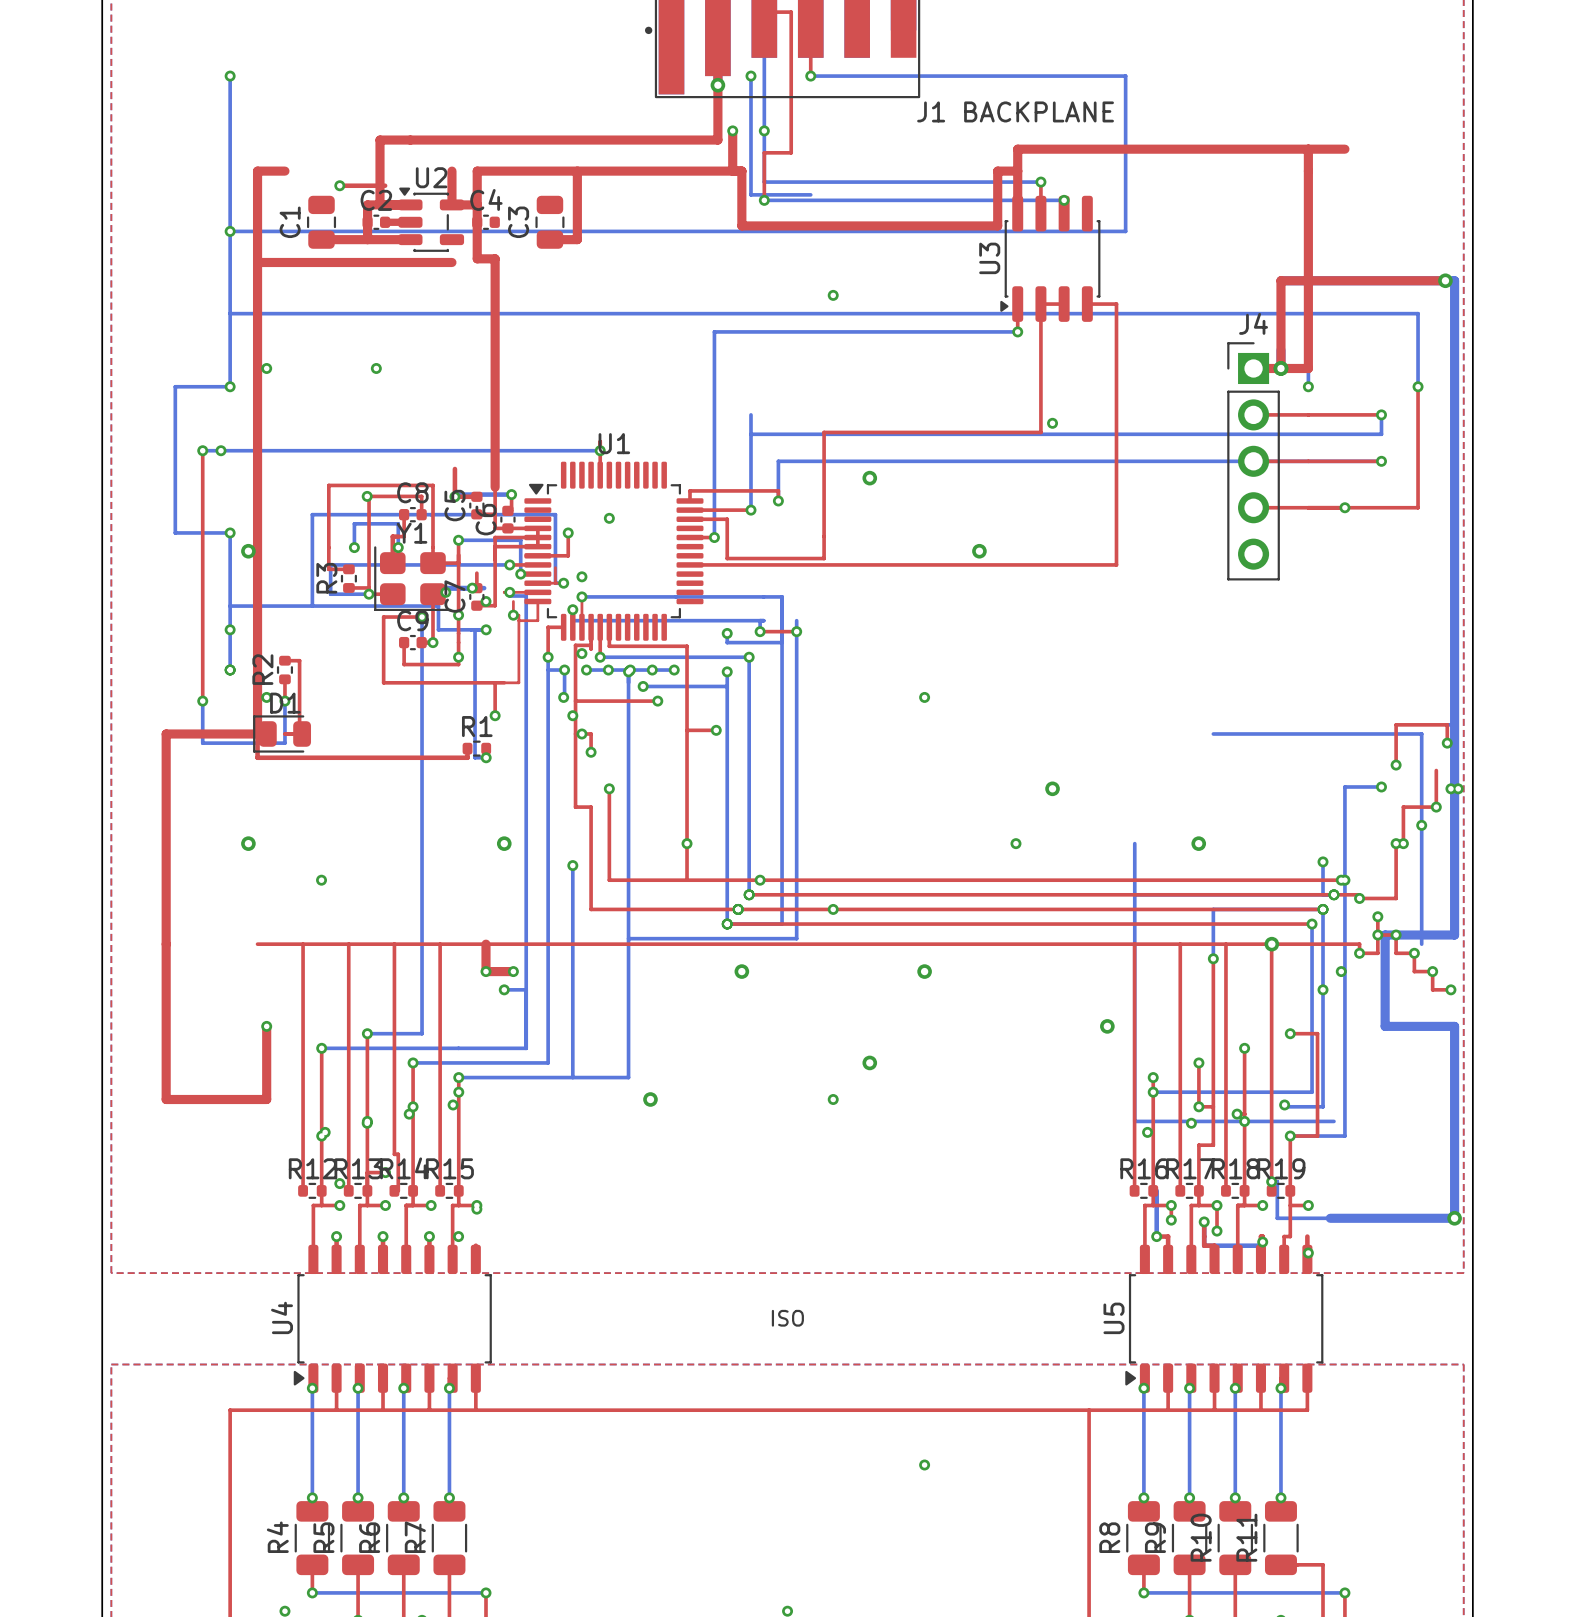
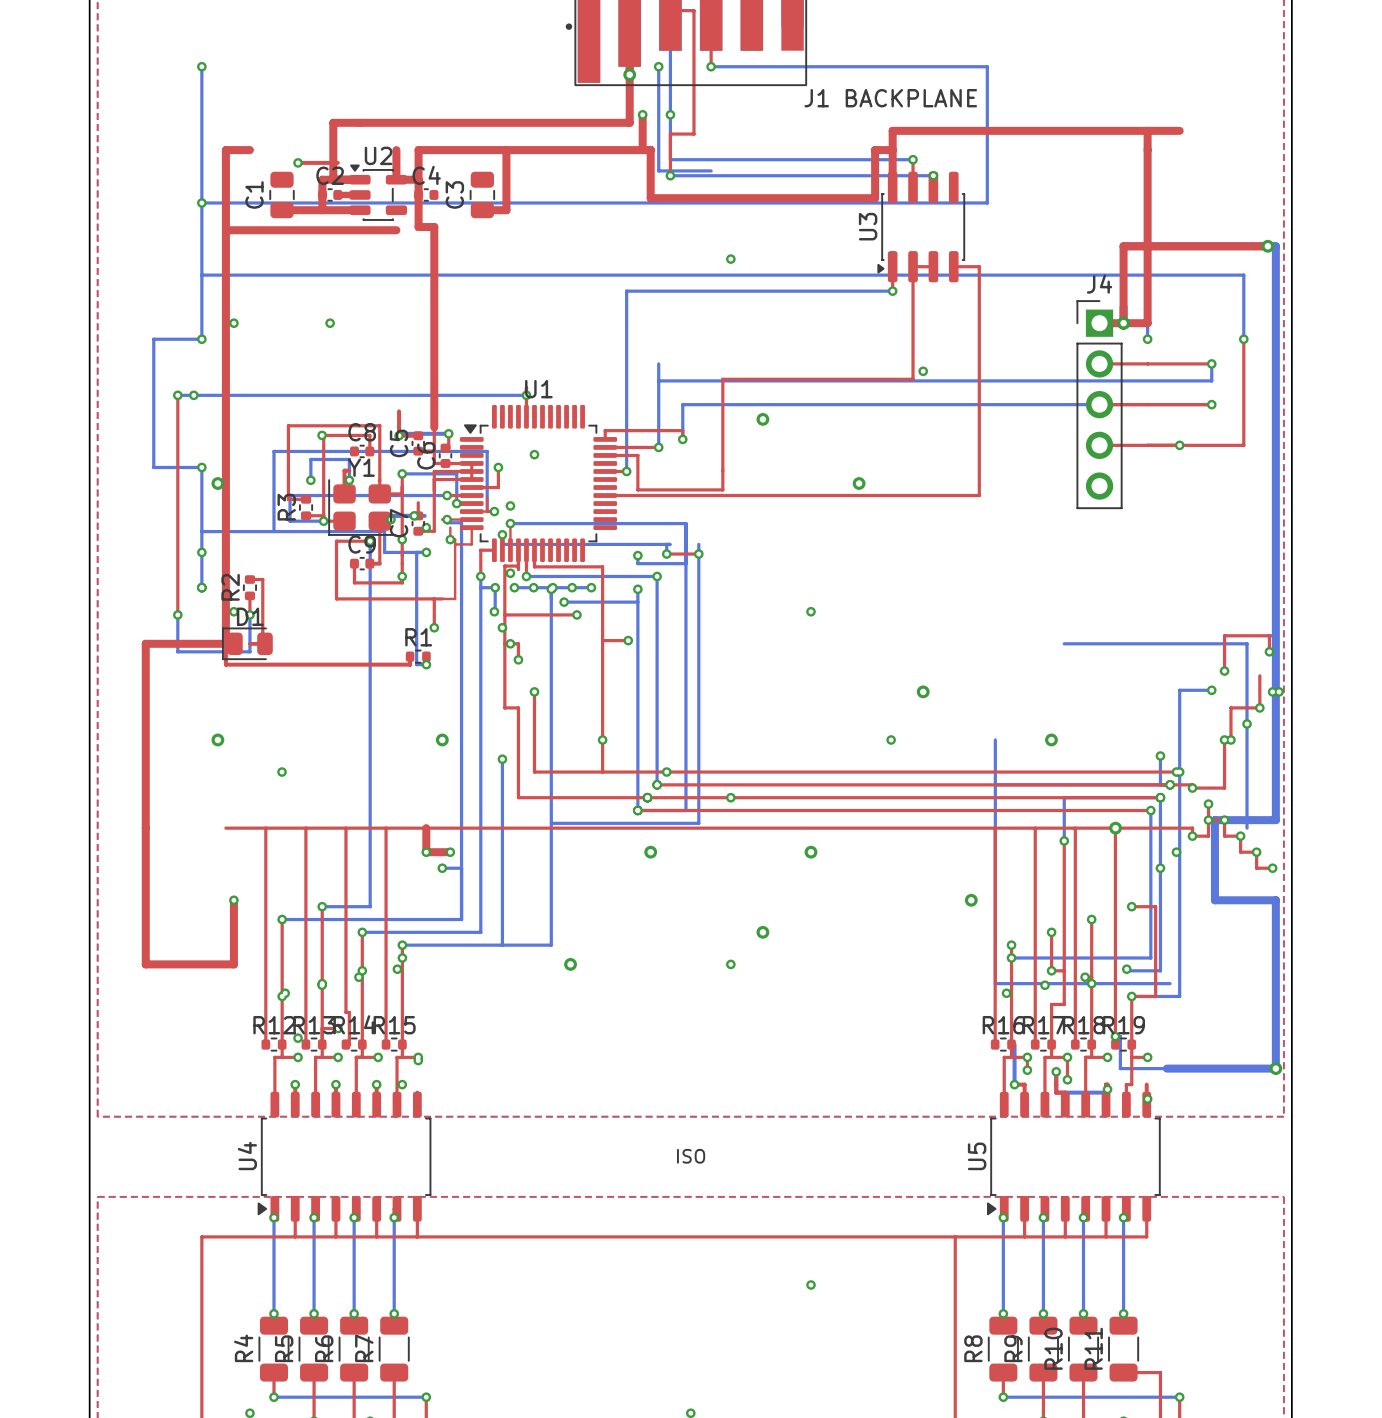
top track: (404, 514) (404, 536) (398, 536) -> none
via: (432, 642) -> none

